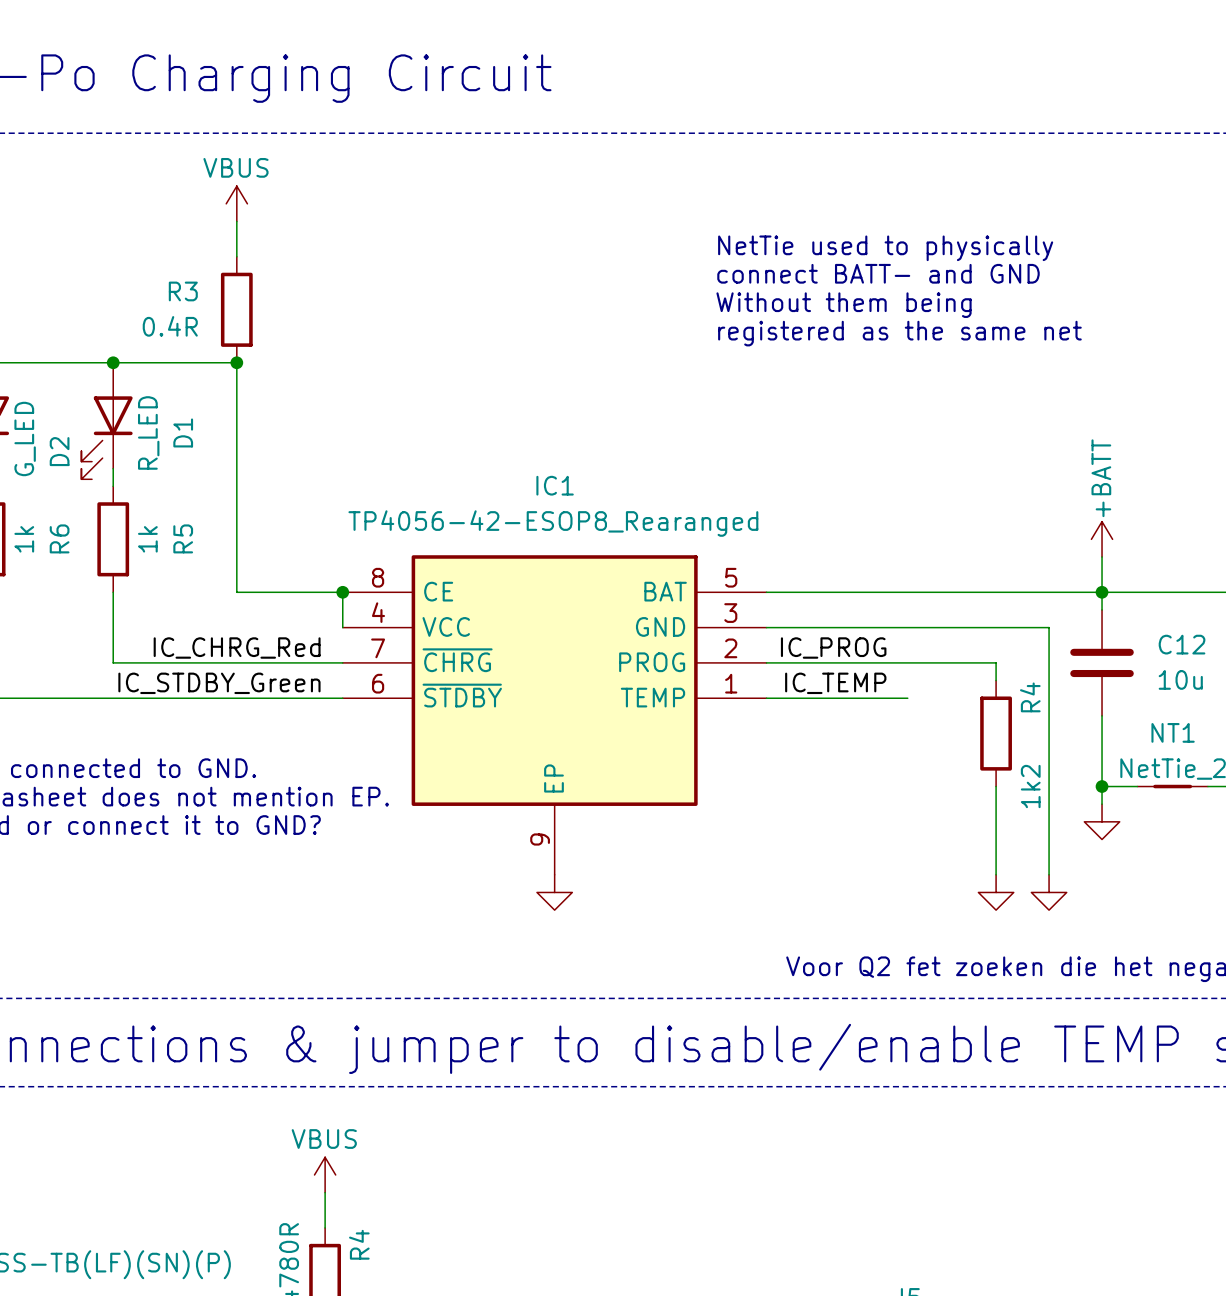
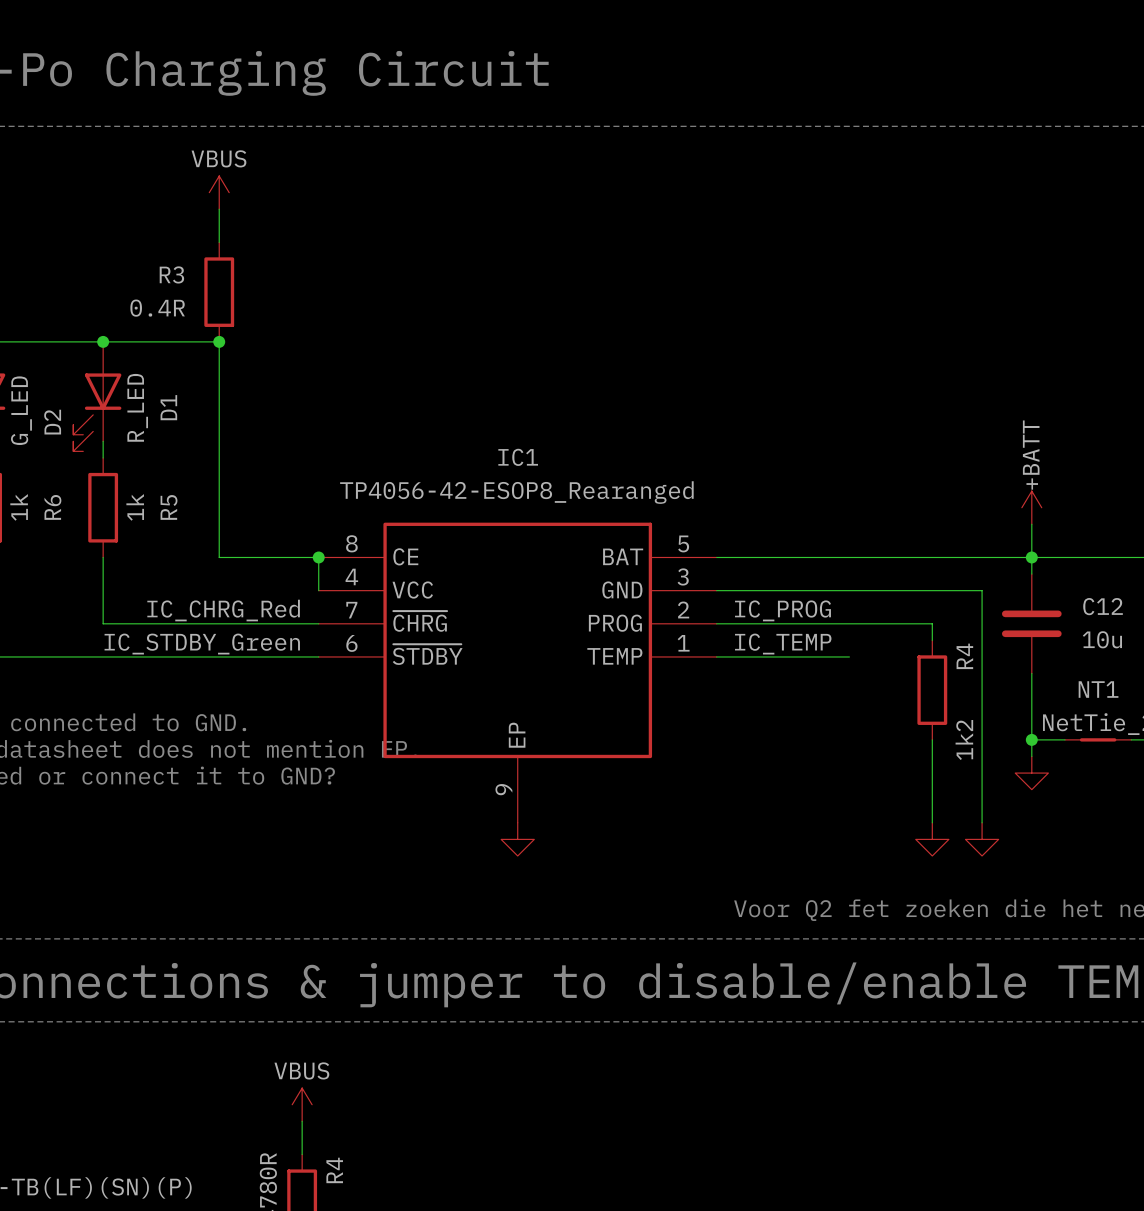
text: NetTie used to physically (885, 248) -> none
text: connect BATT- and GND (878, 273) -> none
text: Without them being (844, 305) -> none
text: registered as the same net (899, 333) -> none

